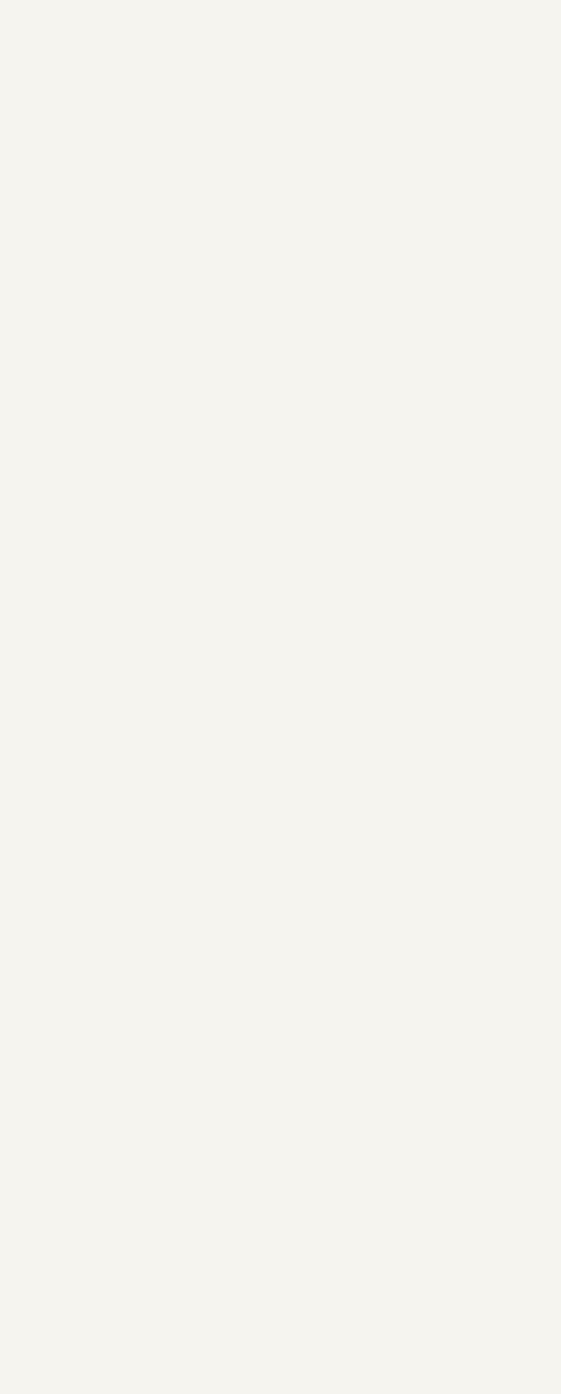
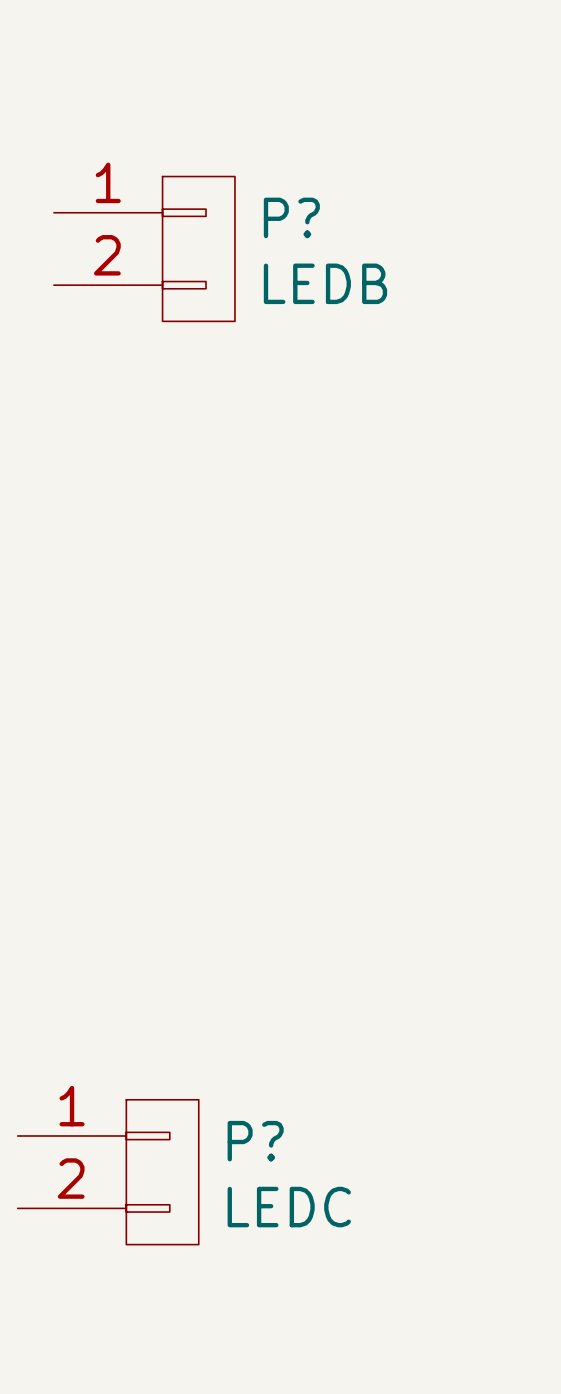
P?: none -> LEDB (144, 248)
P?: none -> LEDC (108, 1172)

